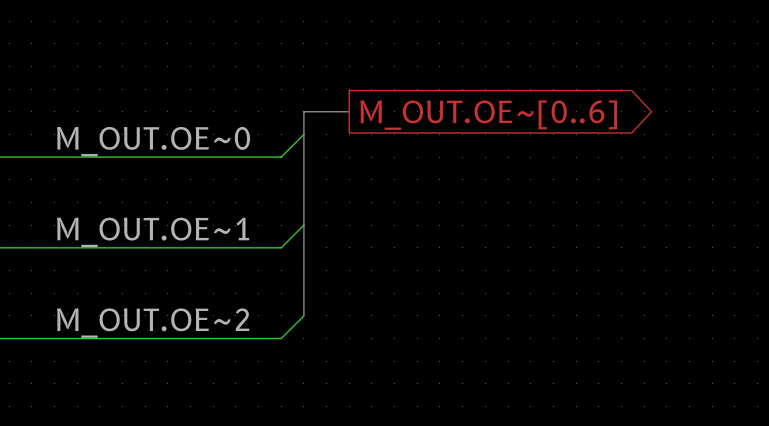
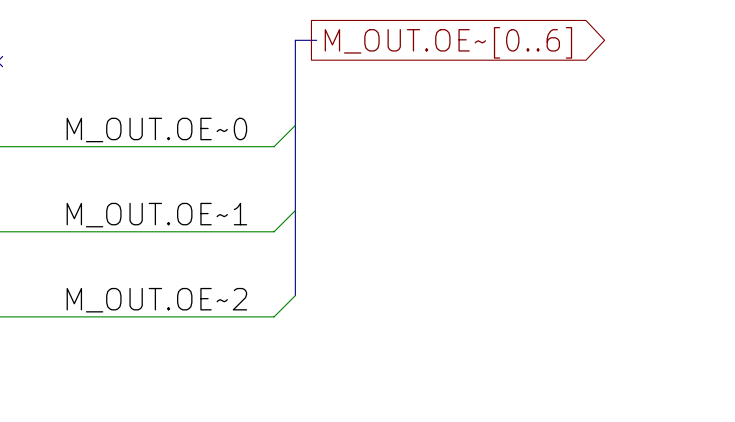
bus: (303, 111) (349, 111) -> (295, 104) (295, 40) (316, 40)
global label position: M_OUT.OE~[0..6] (488, 115) -> M_OUT.OE~[0..6] (448, 42)

